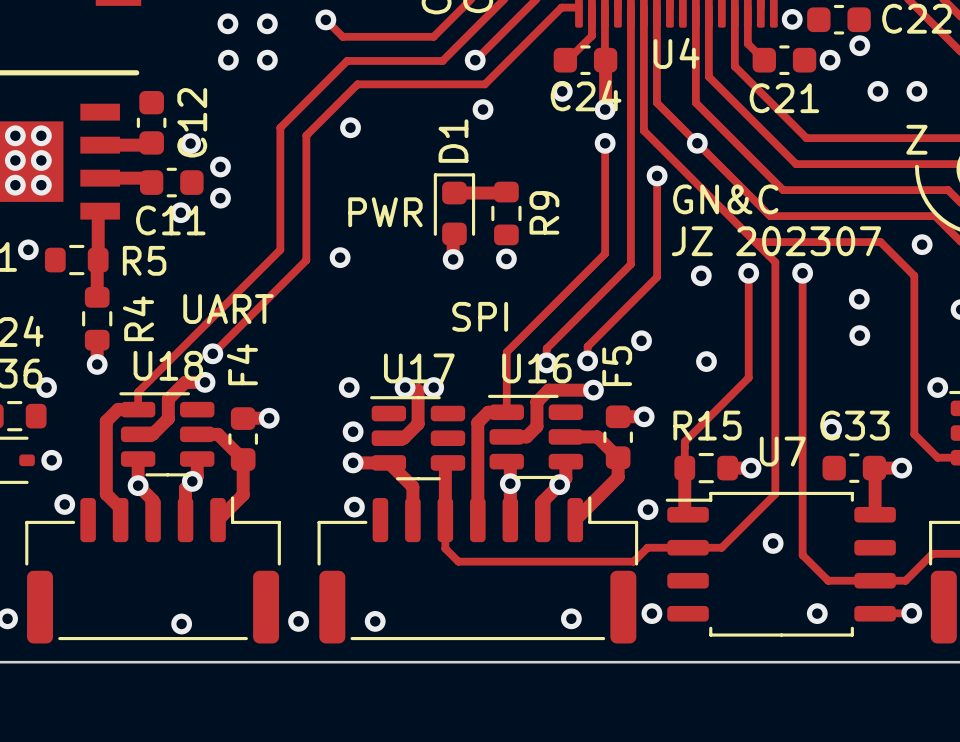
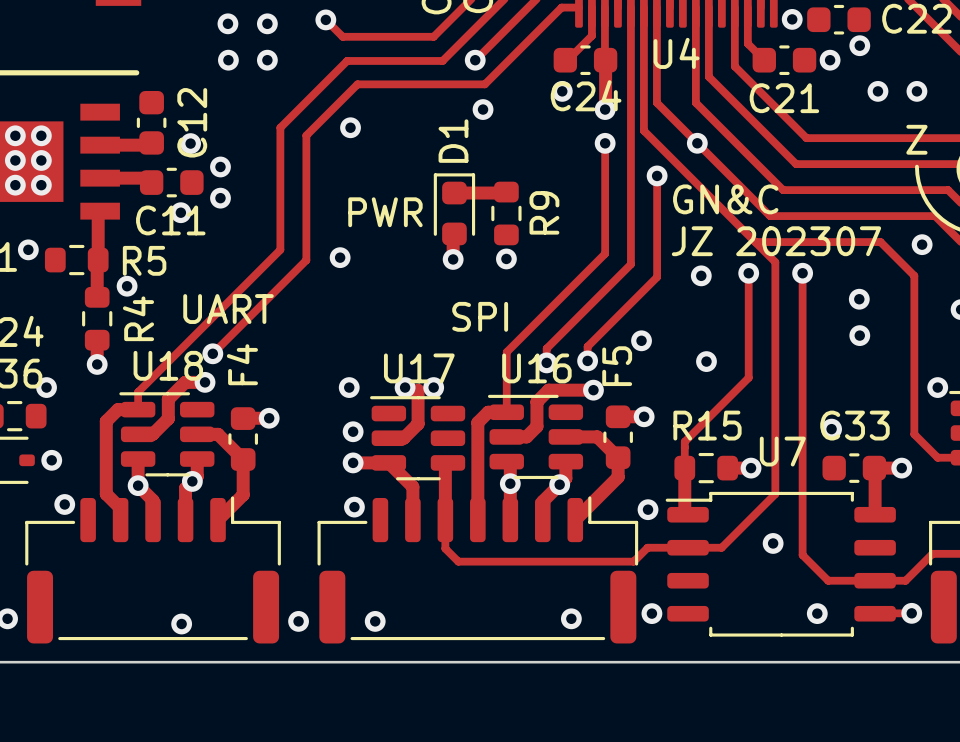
via: none -> (127, 286)

